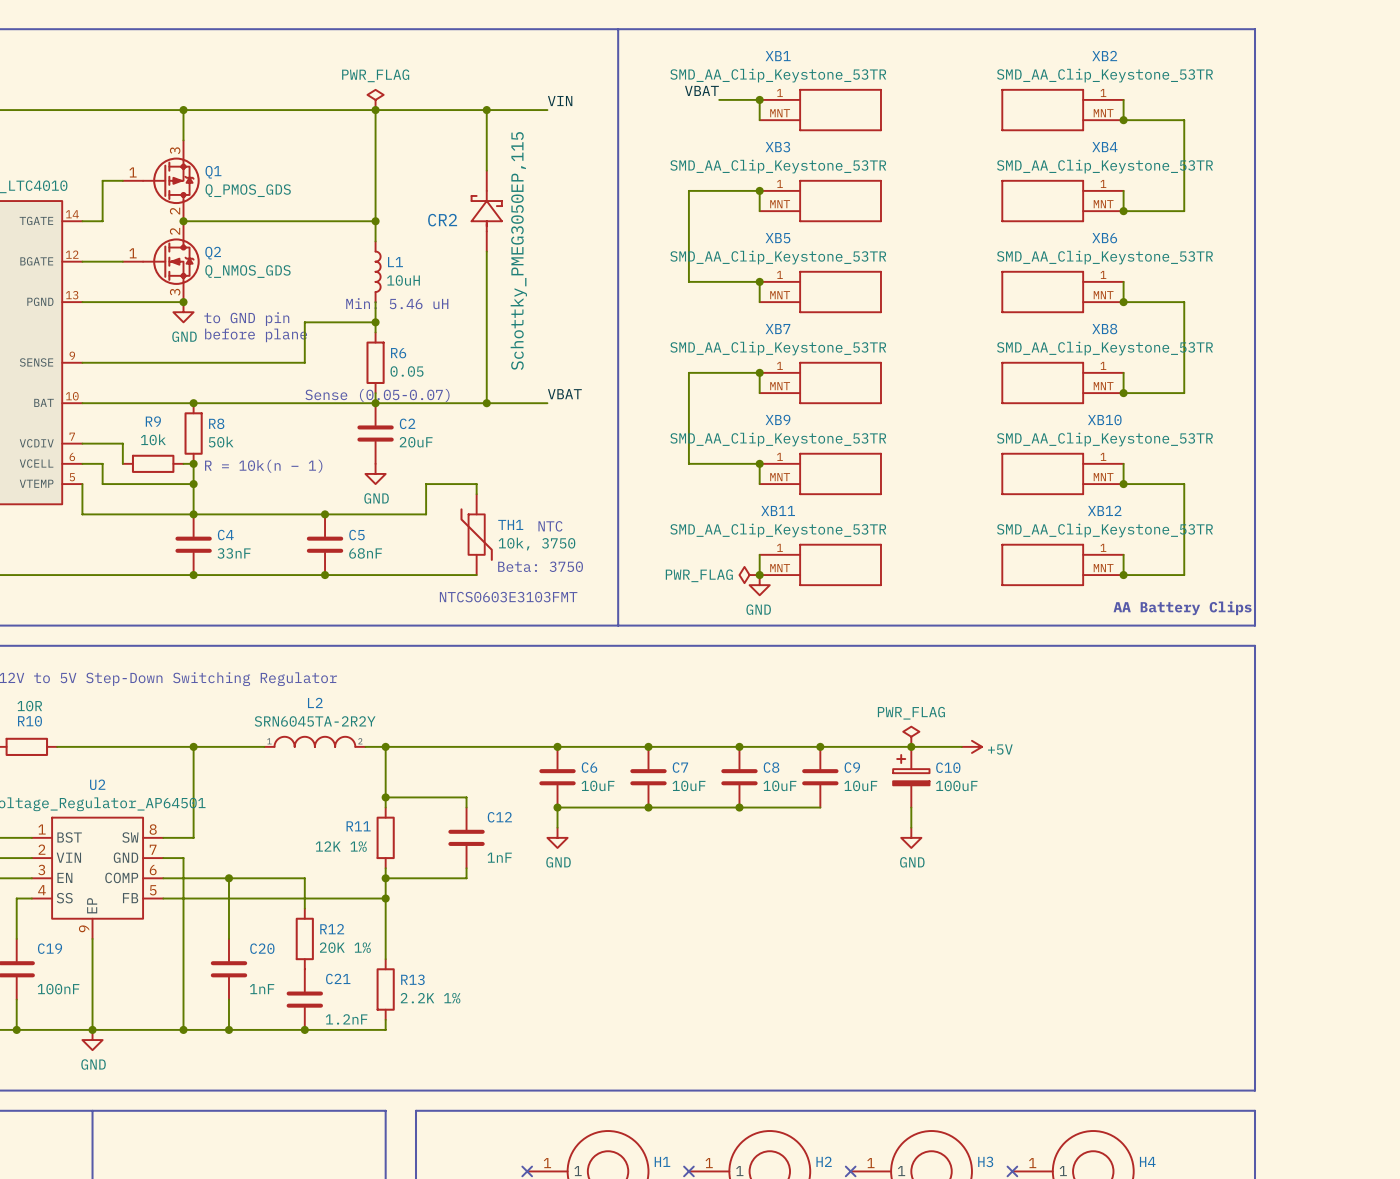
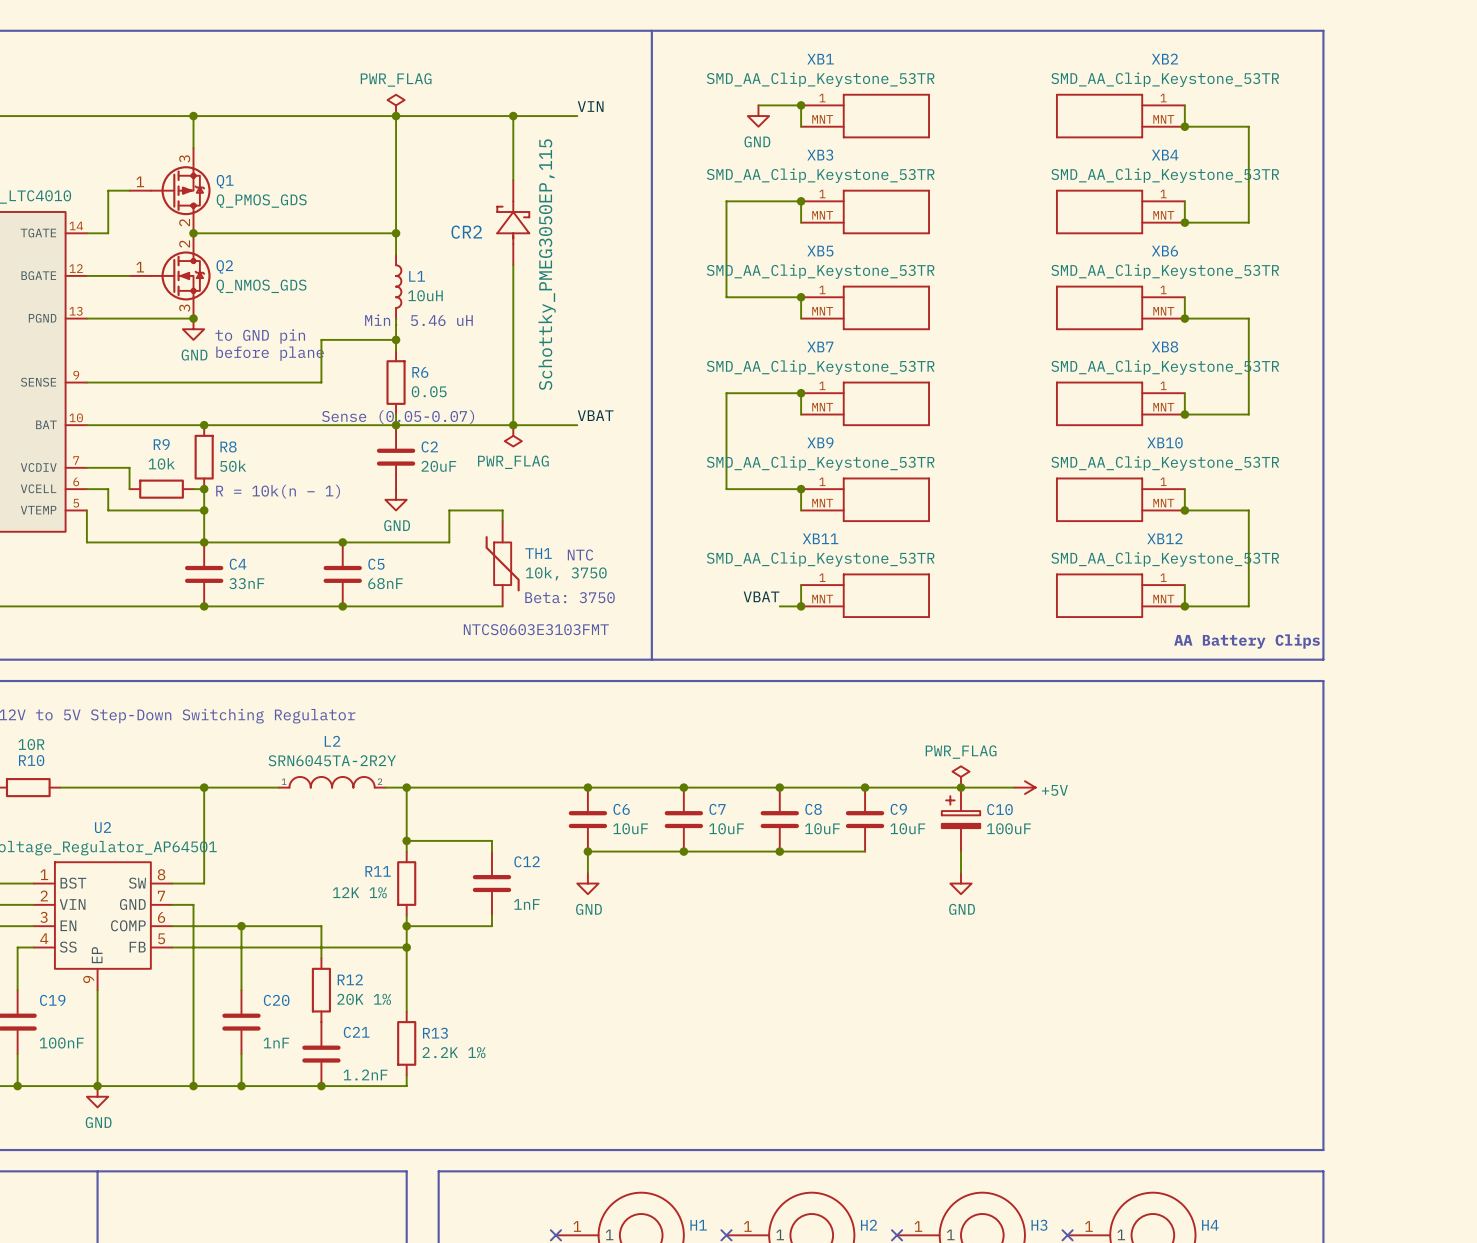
label: VBAT (701, 90) -> none
power symbol: none -> GND (758, 116)
power symbol: none -> PWR_FLAG (513, 435)
label: none -> VBAT (761, 596)
power symbol: PWR_FLAG (749, 575) -> none
power symbol: GND (759, 585) -> none

